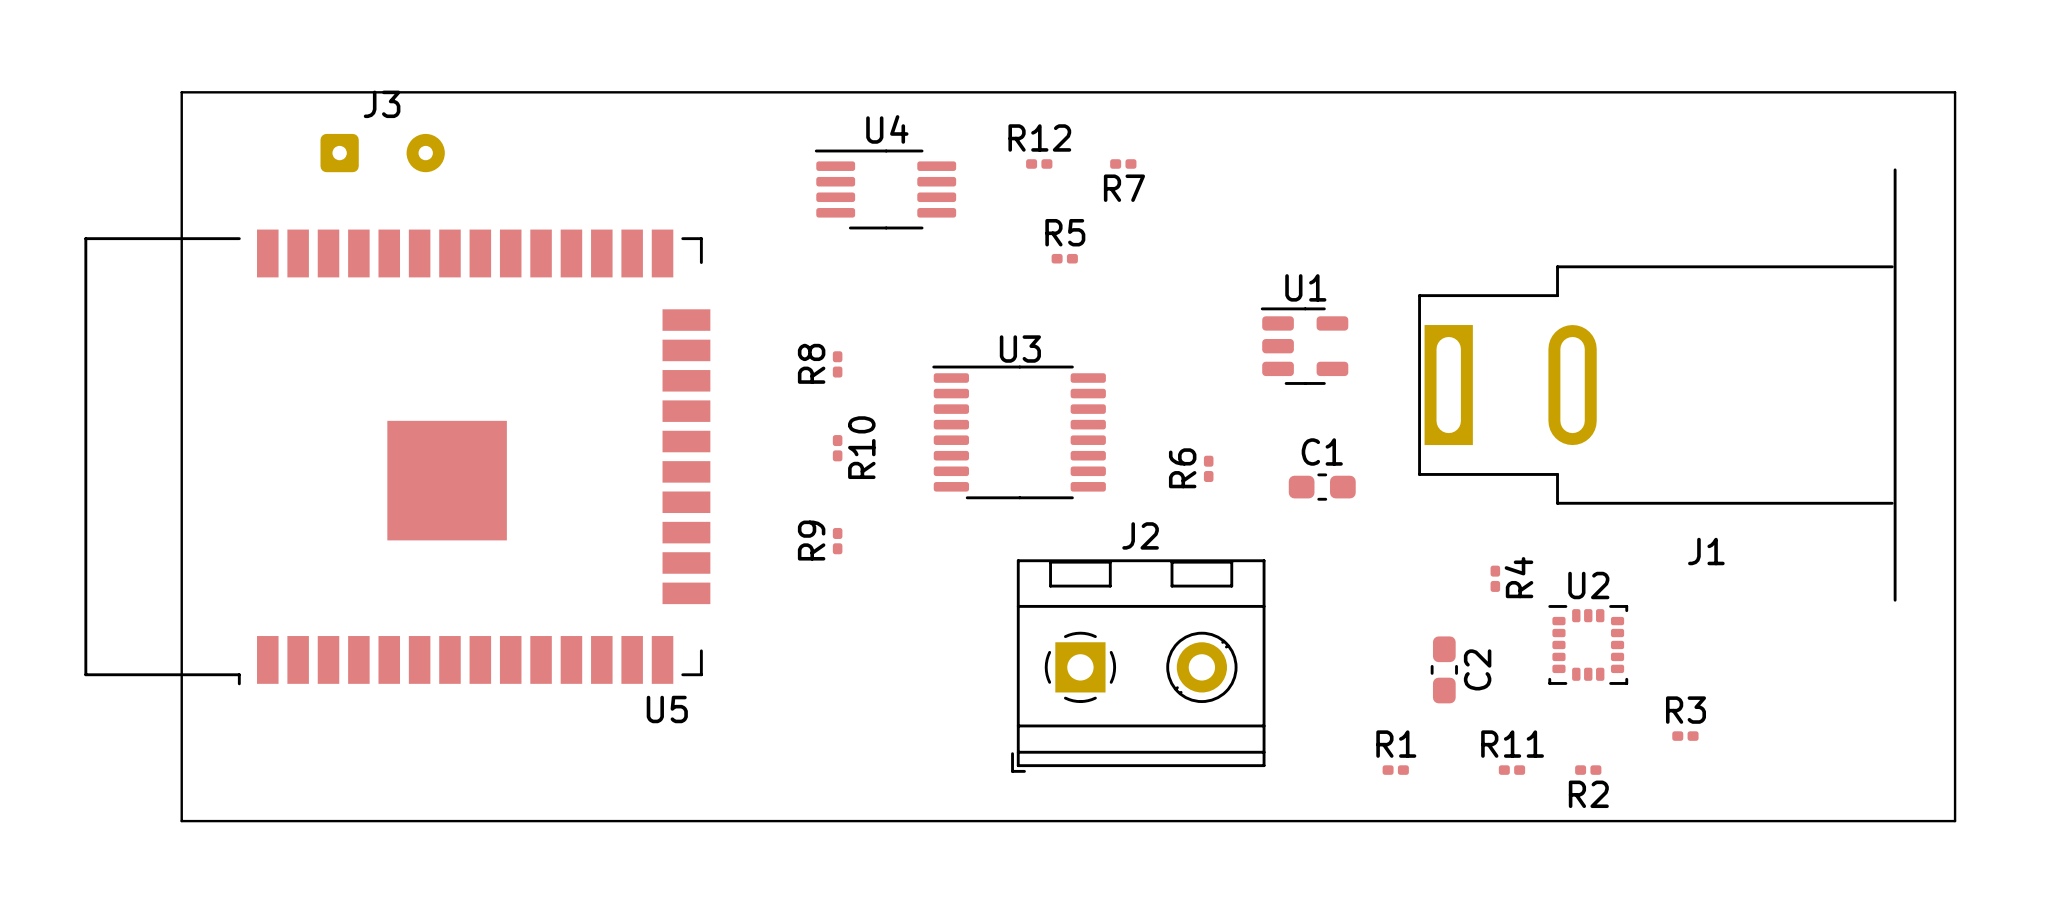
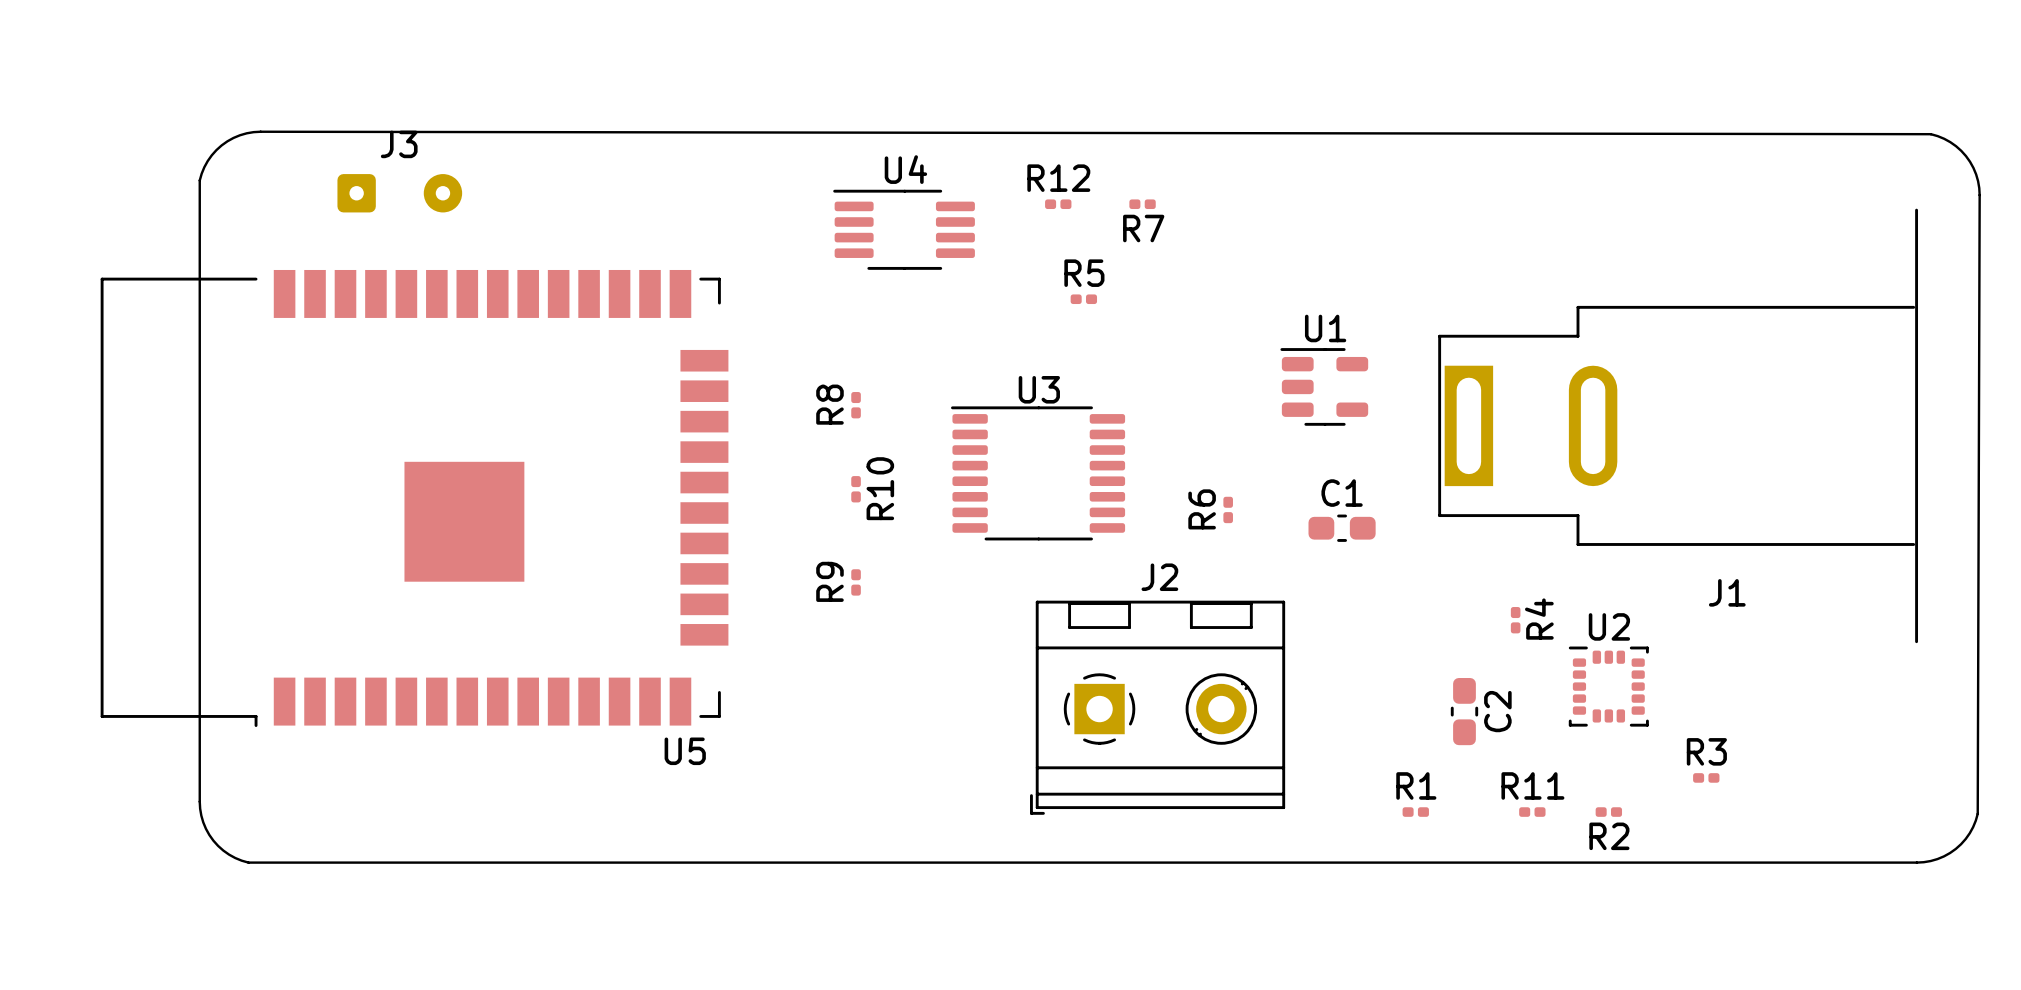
board edge: (181, 92) (1955, 92) (1955, 821) (181, 821) (181, 92) -> (260, 131) (239, 135) (221, 145) (207, 161) (199, 180) (200, 808) (205, 828) (213, 840) (223, 850) (241, 860) (248, 862) (1916, 862) (1930, 861) (1950, 852) (1965, 838) (1975, 820) (1977, 813) (1979, 195) (1976, 174) (1965, 156) (1956, 146) (1937, 136) (1930, 134) (260, 131)

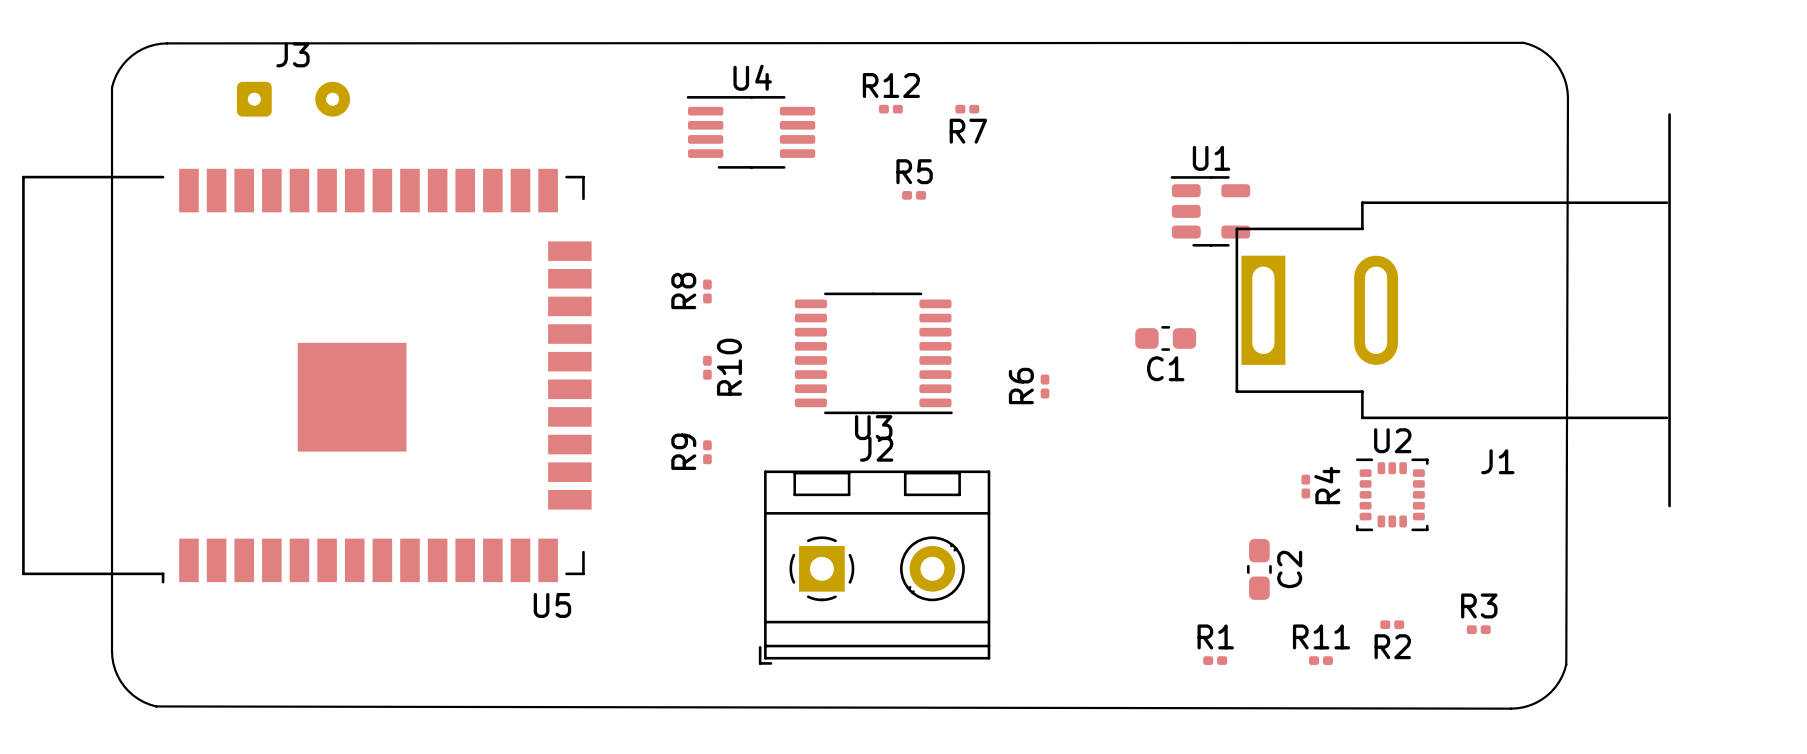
board edge: (260, 131) (1930, 134) (1937, 136) (1956, 146) (1965, 156) (1976, 174) (1979, 188) (1977, 813) (1969, 833) (1955, 848) (1937, 859) (1916, 862) (248, 862) -> (167, 43) (1523, 42) (1535, 47) (1551, 57) (1559, 67) (1564, 79) (1567, 98) (1566, 664) (1559, 682) (1546, 696) (1529, 705) (1511, 708) (156, 706)
U1 position: (1324, 386) -> (1210, 211)
U3 rotation: 0° (1038, 473) -> 180° (873, 353)
C1 name position: C1 (1342, 493) -> C1 (1165, 368)
C1 position: (1342, 528) -> (1165, 338)
U2 position: (1608, 686) -> (1392, 494)
J2 position: (1157, 707) -> (874, 567)
R2 position: (1608, 812) -> (1392, 624)

